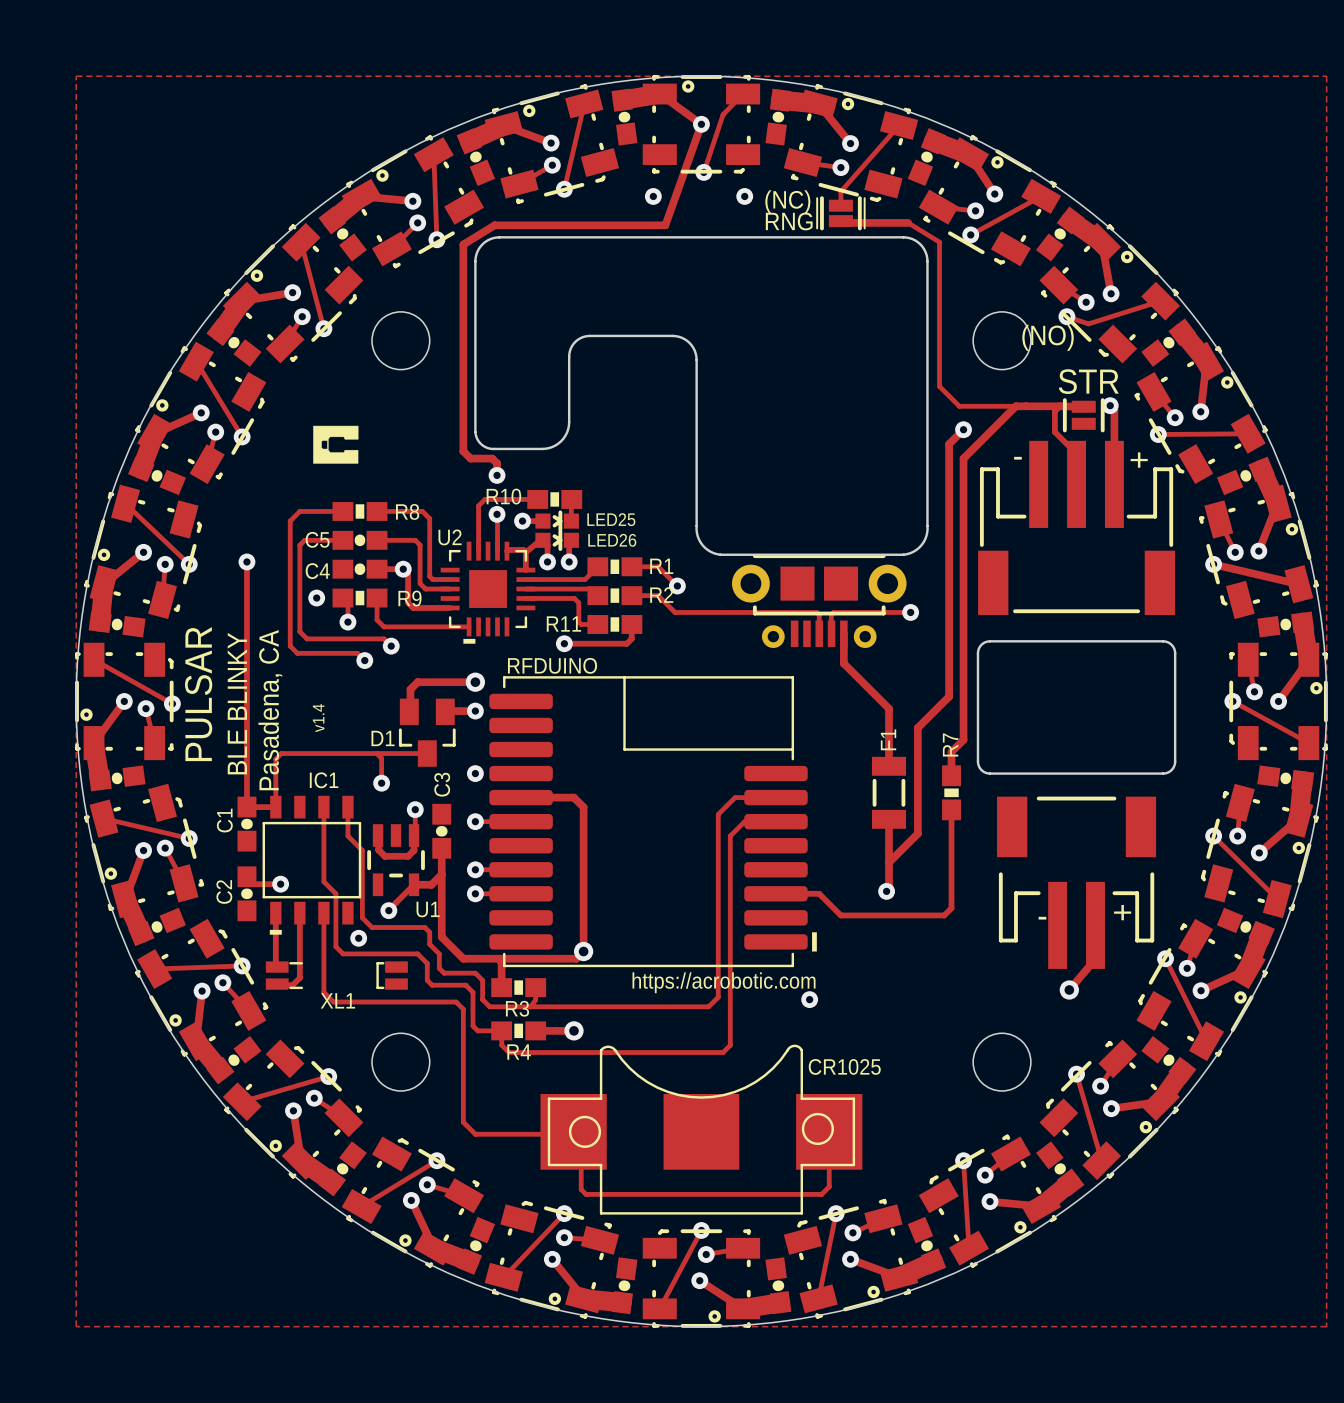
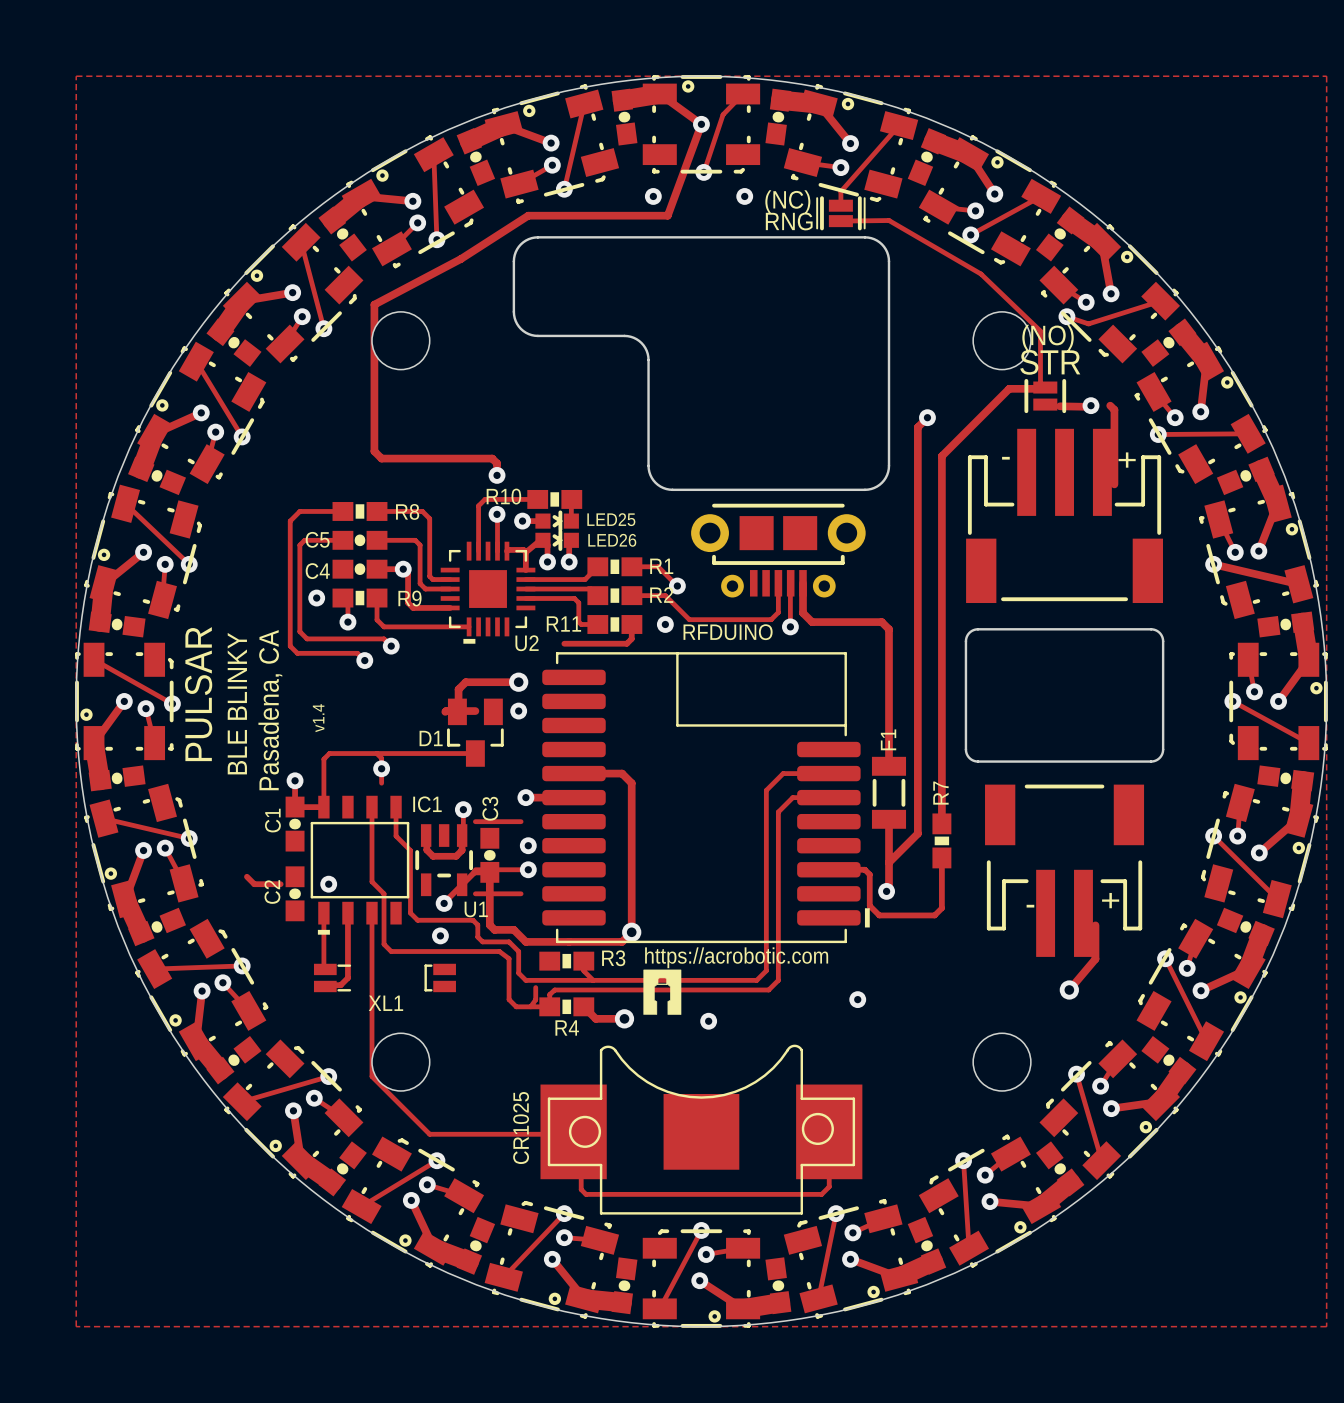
track: (701, 124) (665, 225) (494, 225) (463, 244) (463, 451) (470, 458) -> (701, 124) (667, 215) (528, 215) (460, 258) (374, 304) (374, 451) (381, 458) (470, 458)
track: (840, 221) (840, 222) (908, 222) (939, 242) (939, 386) (959, 406) (1026, 406) -> (840, 221) (889, 220) (980, 274) (1040, 331) (1040, 382) (1045, 387) (1009, 388) (941, 456) (941, 823)
board edge: (537, 237) (493, 238) (482, 244) (476, 255) (475, 432) (479, 442) (492, 448) (542, 448) (552, 446) (561, 441) (568, 425) (569, 351) (577, 340) (589, 335) -> (537, 237) (523, 242) (514, 255) (513, 311) (517, 323) (525, 332) (534, 335) (589, 335)
board edge: (864, 237) (909, 238) (922, 246) (927, 258) (927, 529) (923, 542) (910, 553) (720, 554) (707, 550) (700, 542) (696, 529) (696, 359) (694, 350) (687, 340) (678, 336) (624, 335) -> (864, 237) (874, 239) (881, 244) (887, 252) (889, 261) (889, 465) (885, 477) (874, 488) (864, 489) (672, 489) (660, 486) (651, 477) (648, 468) (647, 353) (639, 340) (624, 335)
via position: (1110, 405) -> (1090, 405)
STR position: (1083, 415) -> (1045, 396)
drawing: [313, 425, 359, 464] -> none
track: (963, 429) (949, 444) (949, 696) (917, 727) -> (927, 417) (917, 427) (917, 727)
via position: (963, 429) -> (927, 417)
text position: - (1017, 458) -> - (1005, 458)
text position: + (1139, 460) -> + (1127, 460)
track: (1076, 484) (1076, 453) (1054, 432) (1054, 411) (1059, 406) (1015, 406) (963, 458) (963, 739) (951, 751) (951, 775) -> none
part position: (1076, 527) -> (1064, 515)
U2 name position: U2 (450, 537) -> U2 (527, 643)
track: (246, 561) (246, 807) (275, 807) (275, 759) (281, 753) (329, 753) -> (295, 780) (295, 807) (323, 807) (323, 759) (329, 753)
via: (246, 561) -> none
track: none -> (790, 583) (790, 626)
track: (658, 595) (674, 612) (816, 612) (819, 614) (819, 633) -> (658, 595) (665, 595) (689, 619) (771, 619) (778, 612) (778, 583)
part position: (819, 601) -> (778, 550)
track: (910, 612) (833, 612) (831, 614) (831, 633) -> none
via: (910, 612) -> none
via: none -> (665, 624)
via: none -> (790, 626)
track: (843, 633) (843, 663) (889, 708) -> (803, 583) (803, 613) (812, 622) (881, 622) (889, 629) (889, 708)
board edge: (989, 641) (1163, 641) (1170, 643) (1175, 653) (1175, 761) (1172, 768) (1163, 773) (989, 773) (982, 771) (977, 761) (977, 653) (981, 644) (989, 641) -> (977, 629) (1151, 629) (1158, 631) (1163, 641) (1163, 749) (1160, 756) (1151, 761) (977, 761) (970, 759) (965, 749) (965, 641) (969, 632) (977, 629)
via: (564, 643) -> none
RFDUINO name position: RFDUINO (552, 665) -> RFDUINO (728, 632)
track: (465, 682) (417, 682) (410, 689) (409, 711) -> (465, 682) (458, 689) (457, 711)
track: none -> (475, 682) (518, 682)
via position: (475, 682) -> (518, 682)
via: (475, 711) -> none
via: none -> (518, 711)
D1 position: (427, 732) -> (475, 732)
track: none -> (427, 753) (475, 753)
via: (475, 773) -> none
track: none -> (573, 773) (622, 773) (631, 783) (631, 932) (622, 941) (525, 941) (513, 929) (494, 929) (489, 925) (489, 872) (474, 872) (444, 903)
track: none -> (828, 773) (783, 773) (766, 790) (766, 970) (756, 980) (525, 980) (518, 973) (518, 951) (509, 941) (482, 941) (477, 937) (477, 925) (472, 920) (417, 920) (410, 913) (410, 850) (396, 836) (396, 807)
via: none -> (295, 780)
IC1 name position: IC1 (324, 780) -> IC1 (427, 804)
via position: (381, 783) -> (381, 768)
R7 position: (951, 792) -> (941, 840)
via: none -> (525, 797)
track: (573, 797) (583, 807) (583, 951) (576, 958) (463, 958) (441, 937) (441, 848) -> none
track: (775, 797) (735, 797) (718, 814) (718, 997) (708, 1006) (549, 1006) -> (828, 797) (792, 797) (778, 812) (778, 980) (768, 989) (554, 989) (549, 994) (549, 1006)
track: (323, 807) (323, 881) (335, 893) (335, 946) (343, 953) (417, 953) (427, 963) (427, 980) (432, 985) (465, 985) (472, 992) (472, 1026) (477, 1030) (501, 1030) (501, 1045) (509, 1052) (723, 1052) (730, 1045) (730, 836) (744, 821) (775, 821) -> none
track: (347, 807) (347, 836) (362, 850) (362, 917) (372, 927) (424, 927) (429, 932) (429, 944) (439, 953) (439, 968) (444, 973) (475, 973) (482, 980) (482, 999) (489, 1006) (516, 1006) -> (372, 807) (372, 881) (384, 893) (384, 944) (391, 951) (499, 951) (509, 958) (509, 999) (516, 1006)
track: (415, 809) (414, 850) (408, 856) (384, 856) (378, 850) (378, 835) -> (463, 809) (462, 850) (456, 856) (433, 856) (426, 850) (426, 835)
via: (415, 809) -> none
track: (951, 809) (951, 908) (944, 915) (934, 915) -> (941, 857) (941, 908) (934, 915)
via position: (475, 821) -> (463, 809)
RFDUINO position: (653, 821) -> (706, 797)
C1 position: (246, 824) -> (295, 824)
C3 position: (441, 831) -> (489, 855)
via: none -> (528, 845)
U1 position: (396, 860) -> (444, 860)
IC1 position: (311, 865) -> (359, 865)
via: (475, 869) -> none
via: none -> (528, 869)
track: (441, 874) (431, 884) (414, 884) (388, 910) -> none
part position: (1076, 882) -> (1064, 870)
via: (280, 884) -> none
via: none -> (328, 884)
C2 position: (246, 893) -> (295, 893)
via: (475, 893) -> none
track: (775, 893) (819, 893) (840, 915) (879, 915) -> (828, 869) (864, 869) (869, 874) (869, 905) (879, 915)
via: none -> (444, 903)
via: (388, 910) -> none
track: (276, 913) (277, 967) -> none
track: (299, 913) (299, 977) (292, 985) (277, 984) -> none
track: none -> (347, 913) (347, 977) (340, 985) (325, 986)
via: none -> (631, 932)
via: none -> (440, 935)
via: (358, 938) -> none
via: (583, 951) -> none
track: (499, 958) (501, 963) (501, 987) -> none
track: none -> (583, 961) (583, 970) (593, 980)
track: (323, 968) (323, 992) (333, 1002) (456, 1002) (463, 1009) (463, 1122) (475, 1134) -> (372, 913) (372, 1076) (429, 1134) (475, 1134)
drawing: none -> [643, 969, 682, 1015]
XL1 position: (336, 975) -> (384, 977)
text position: https://acrobotic.com (724, 982) -> https://acrobotic.com (736, 957)
R3 position: (518, 987) -> (566, 961)
via position: (809, 999) -> (857, 999)
track: none -> (583, 1006) (595, 1018) (624, 1018)
R3 name position: R3 (517, 1008) -> R3 (613, 958)
via: none -> (624, 1018)
via: none -> (708, 1021)
R4 position: (518, 1030) -> (566, 1006)
track: (535, 1030) (573, 1030) -> none
via: (573, 1030) -> none
part footprint: [540, 1044, 863, 1215] -> [540, 1044, 863, 1215]
text rotation: 0° (844, 1066) -> 90° counterclockwise (521, 1128)
text position: CR1025 (844, 1066) -> CR1025 (521, 1128)

